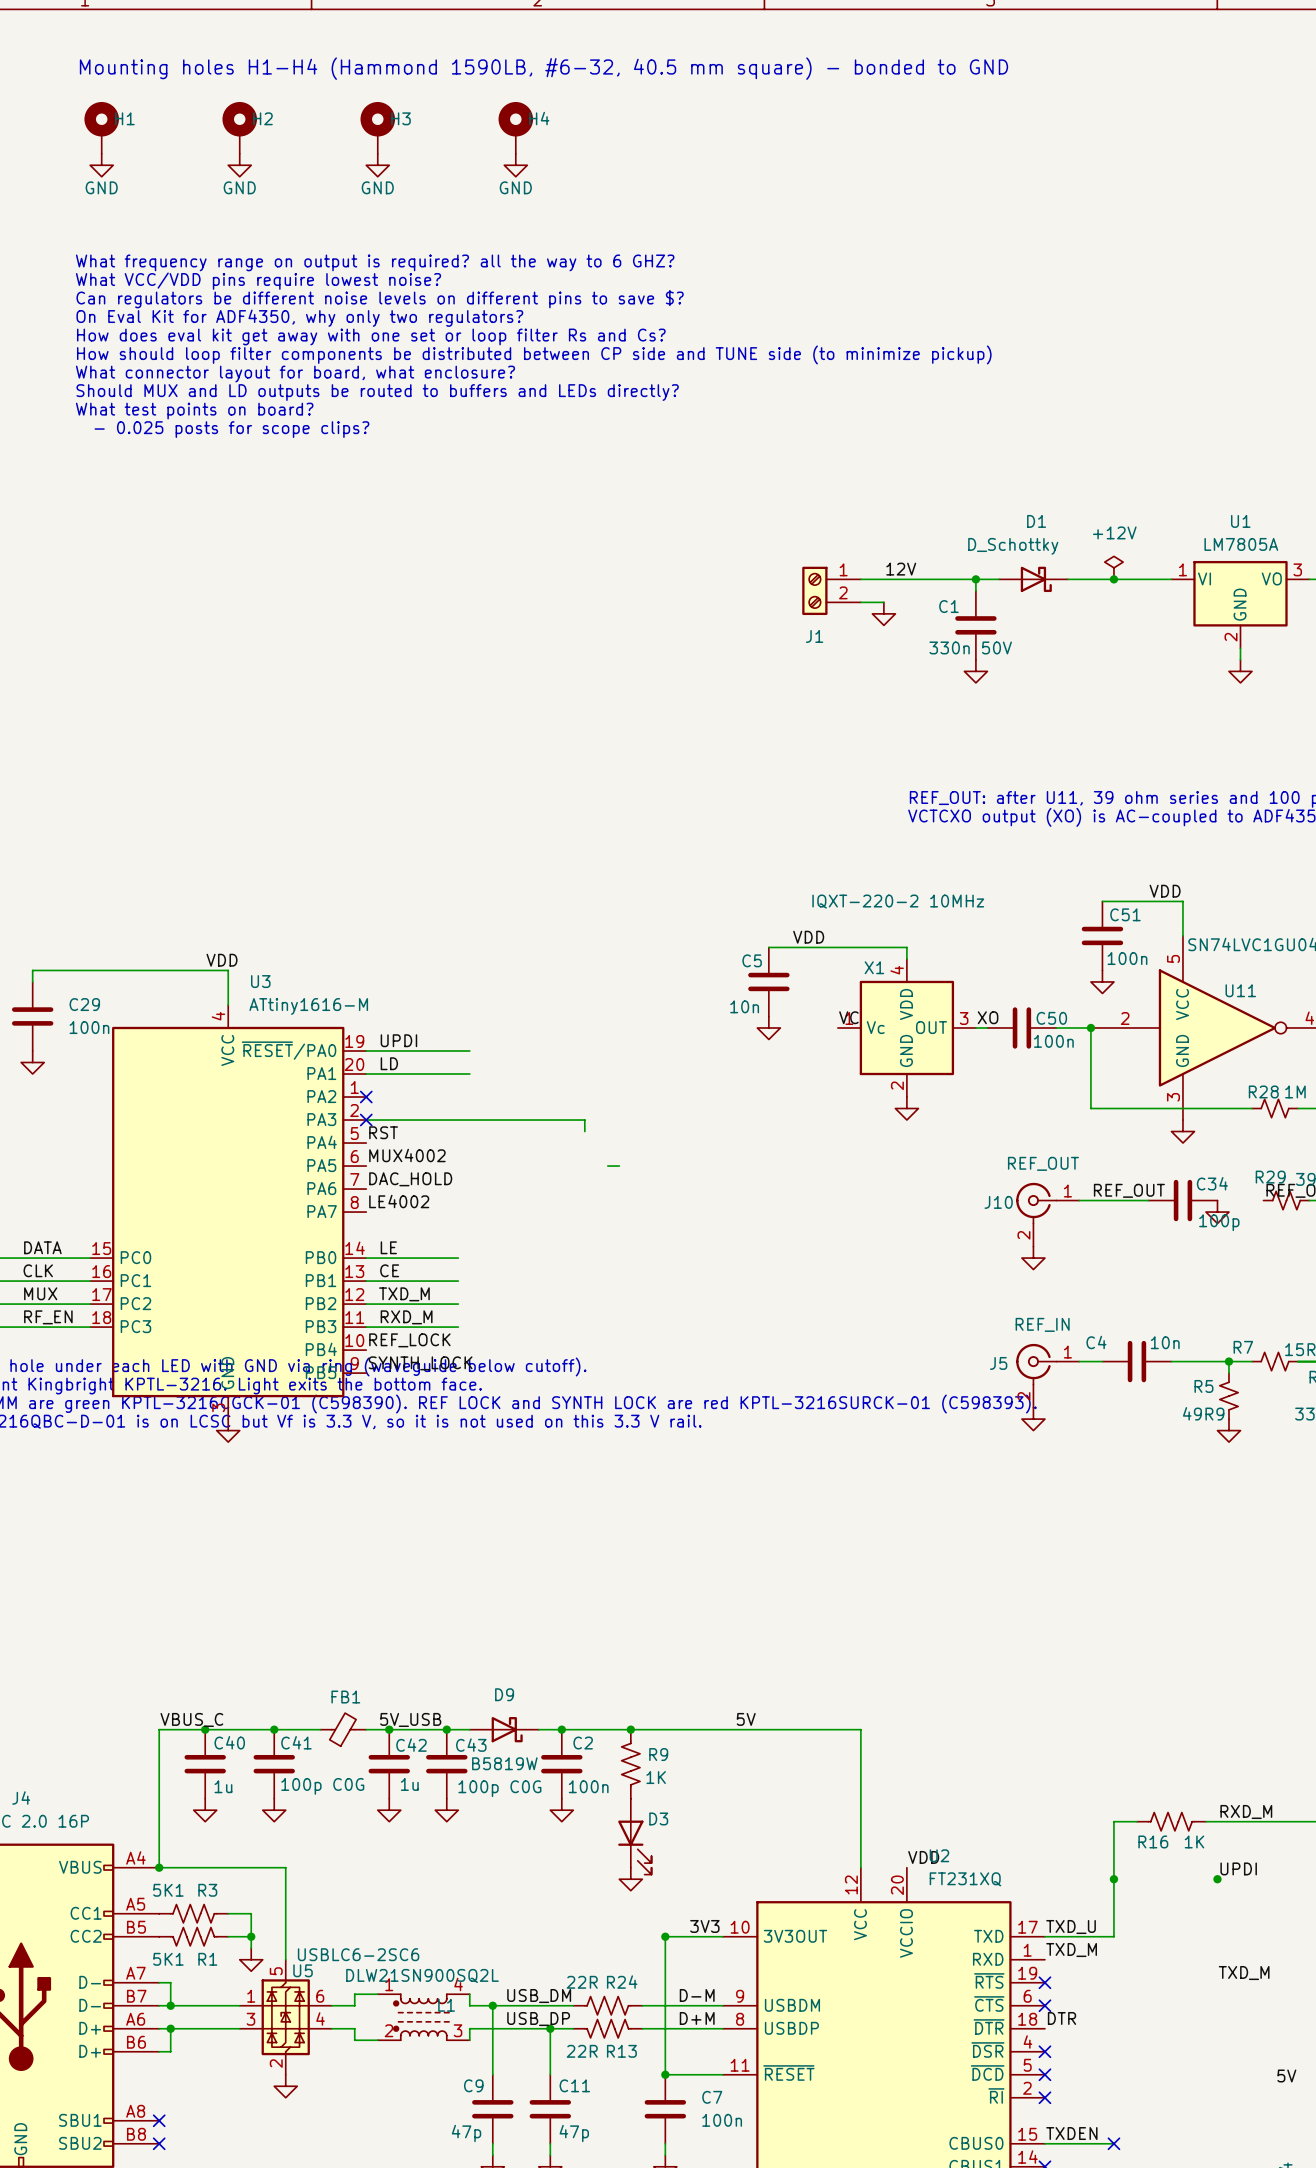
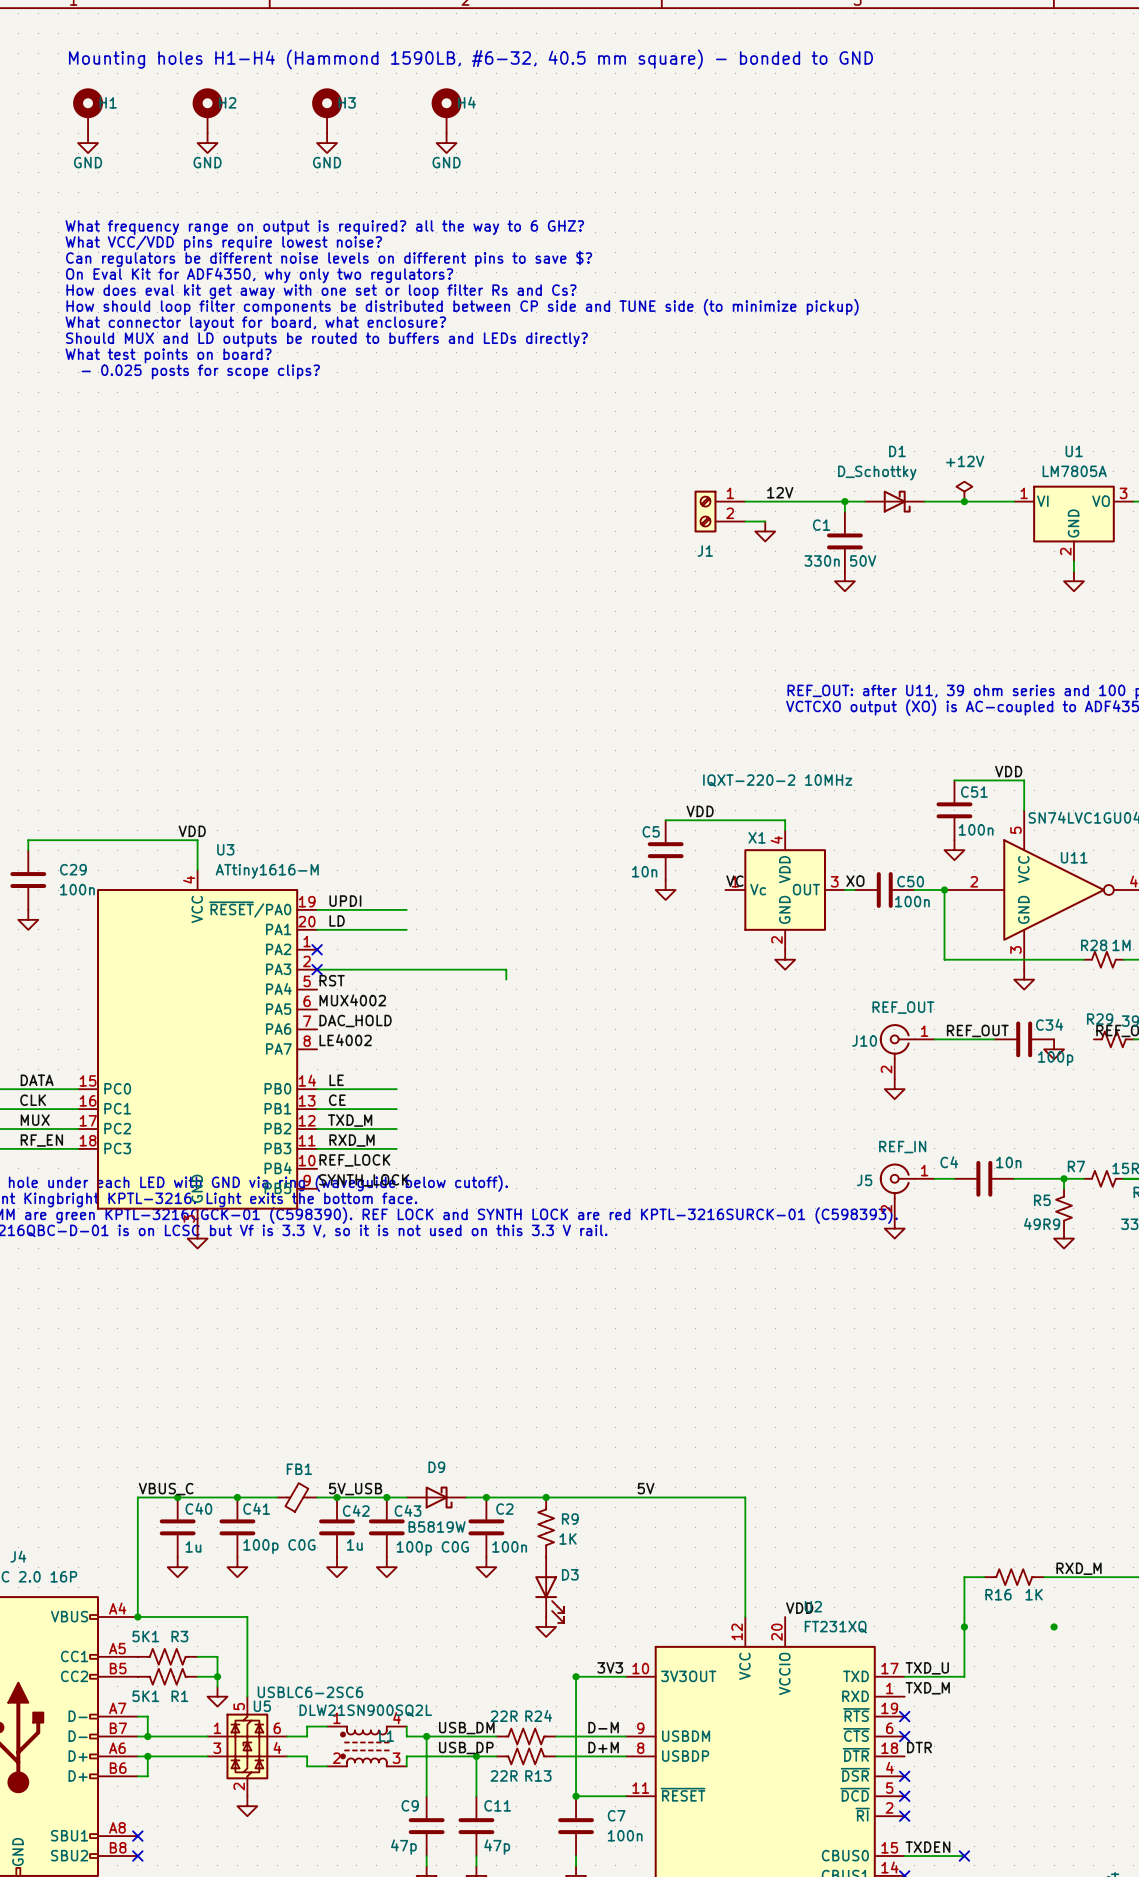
wire: (607, 1166) (619, 1166) -> none
label: UPDI (1238, 1868) -> none
label: TXD_M (1244, 1973) -> none
label: 5V (1286, 2076) -> none

